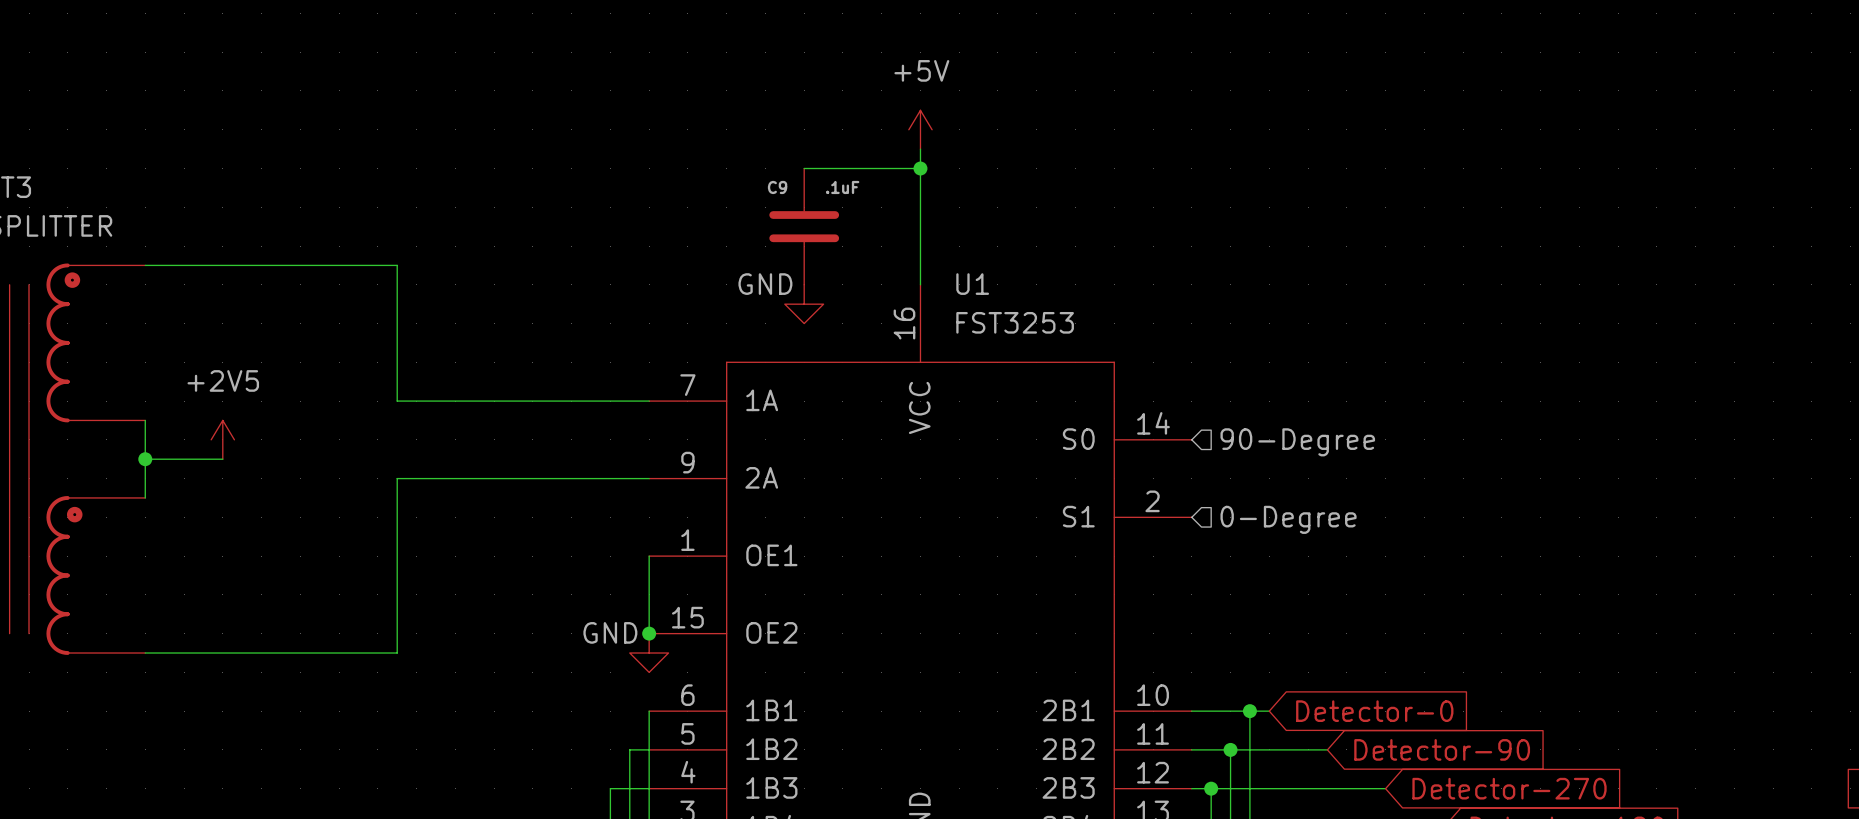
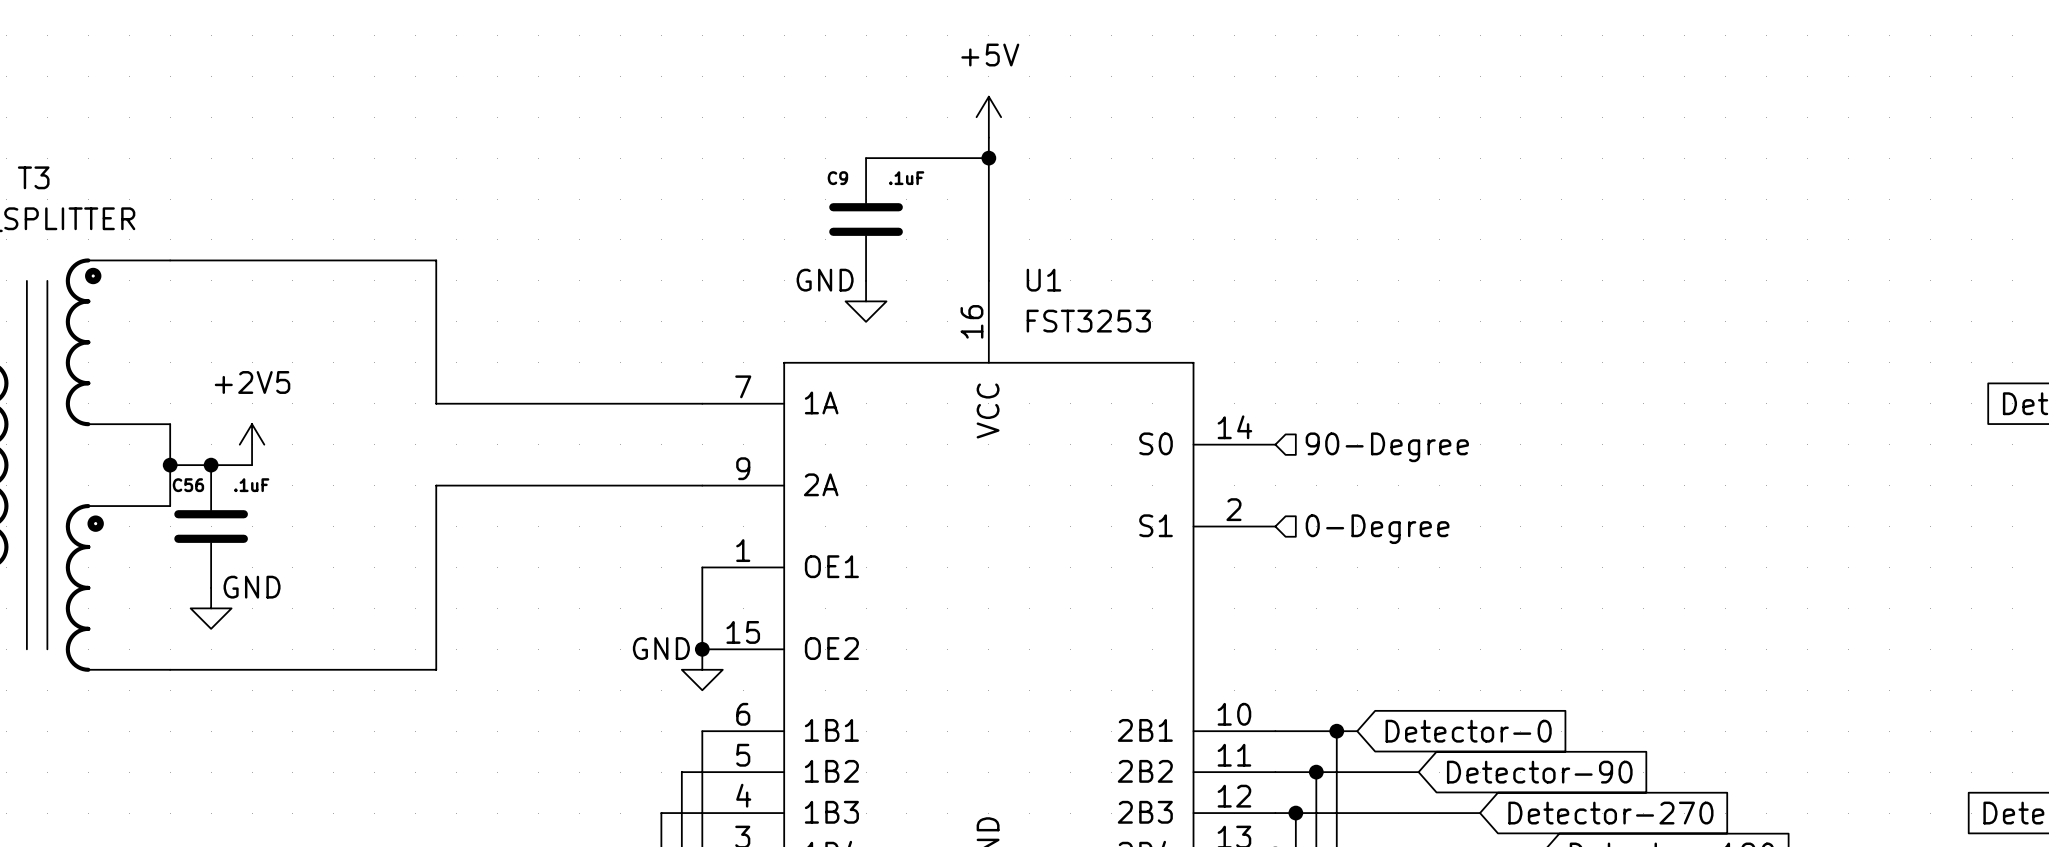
junction: none -> (211, 465)
C56: none -> .1uF (211, 526)
power symbol: none -> GND (211, 608)

